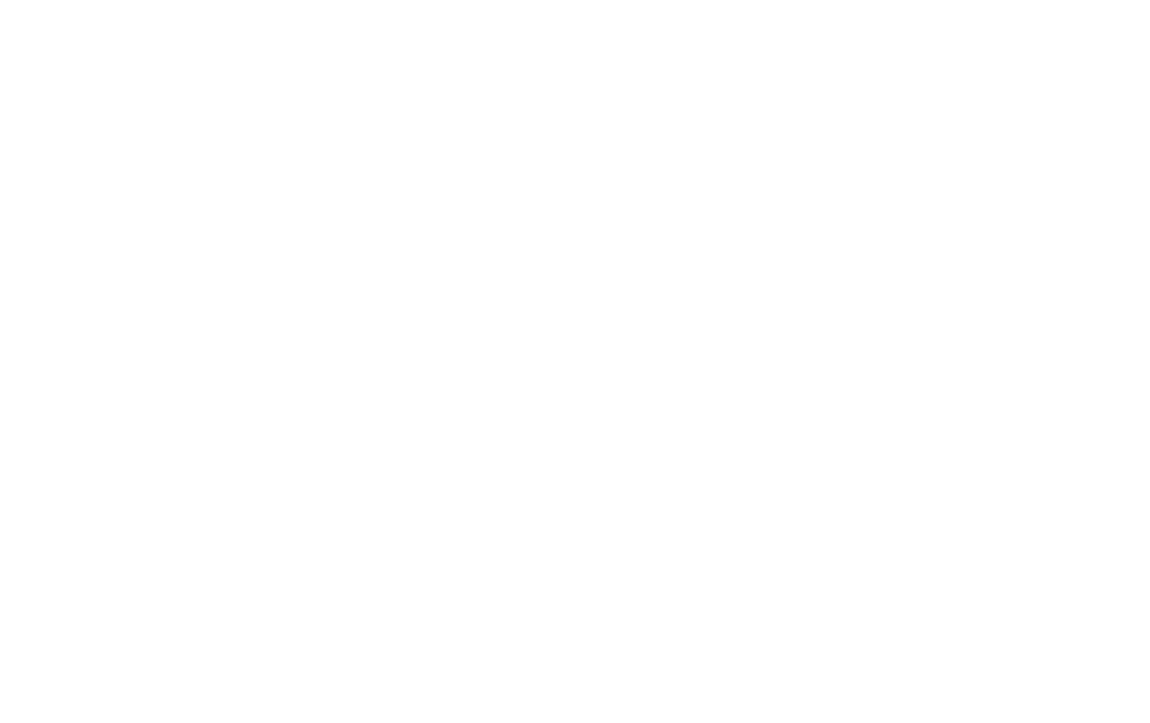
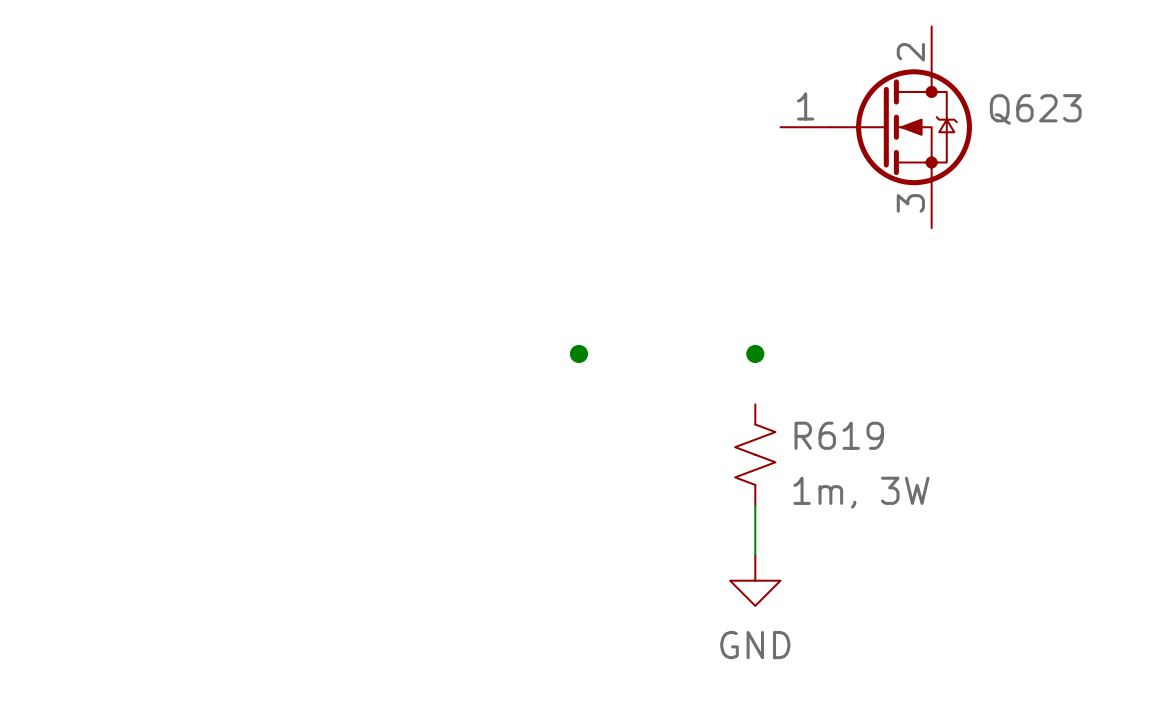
Q623: none -> (876, 127)
junction: none -> (578, 353)
junction: none -> (755, 353)
R619: none -> 1m, 3W (755, 454)
wire: none -> (755, 505) (755, 555)
power symbol: none -> GND (755, 580)

